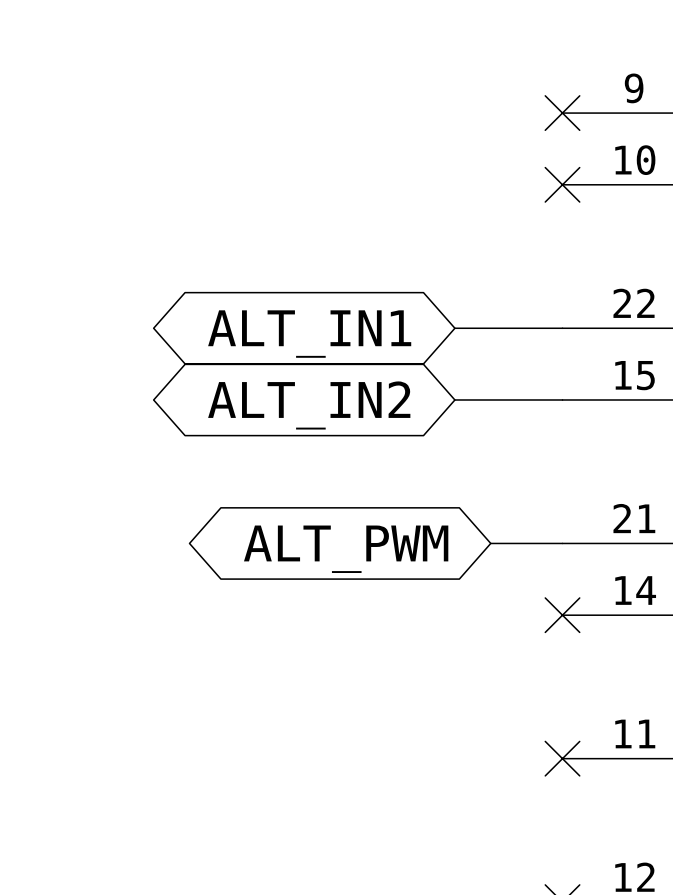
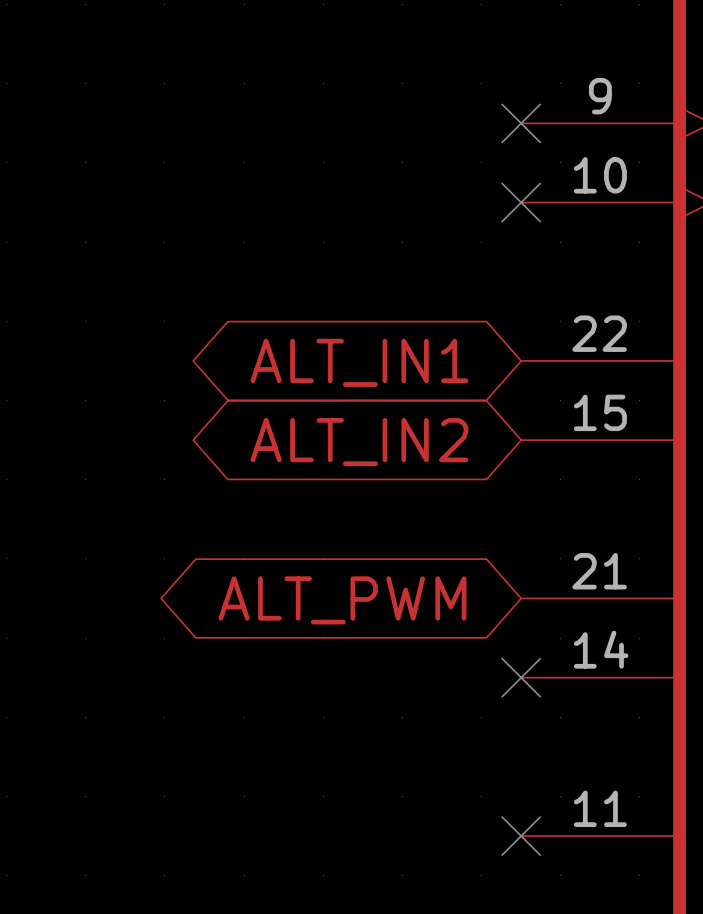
wire: (454, 328) (562, 328) -> none
global label position: ALT_IN1 (309, 334) -> ALT_IN1 (359, 362)
wire: (454, 399) (562, 399) -> none
global label position: ALT_IN2 (309, 405) -> ALT_IN2 (359, 442)
wire: (490, 543) (562, 543) -> none
global label position: ALT_PWM (346, 549) -> ALT_PWM (342, 600)

